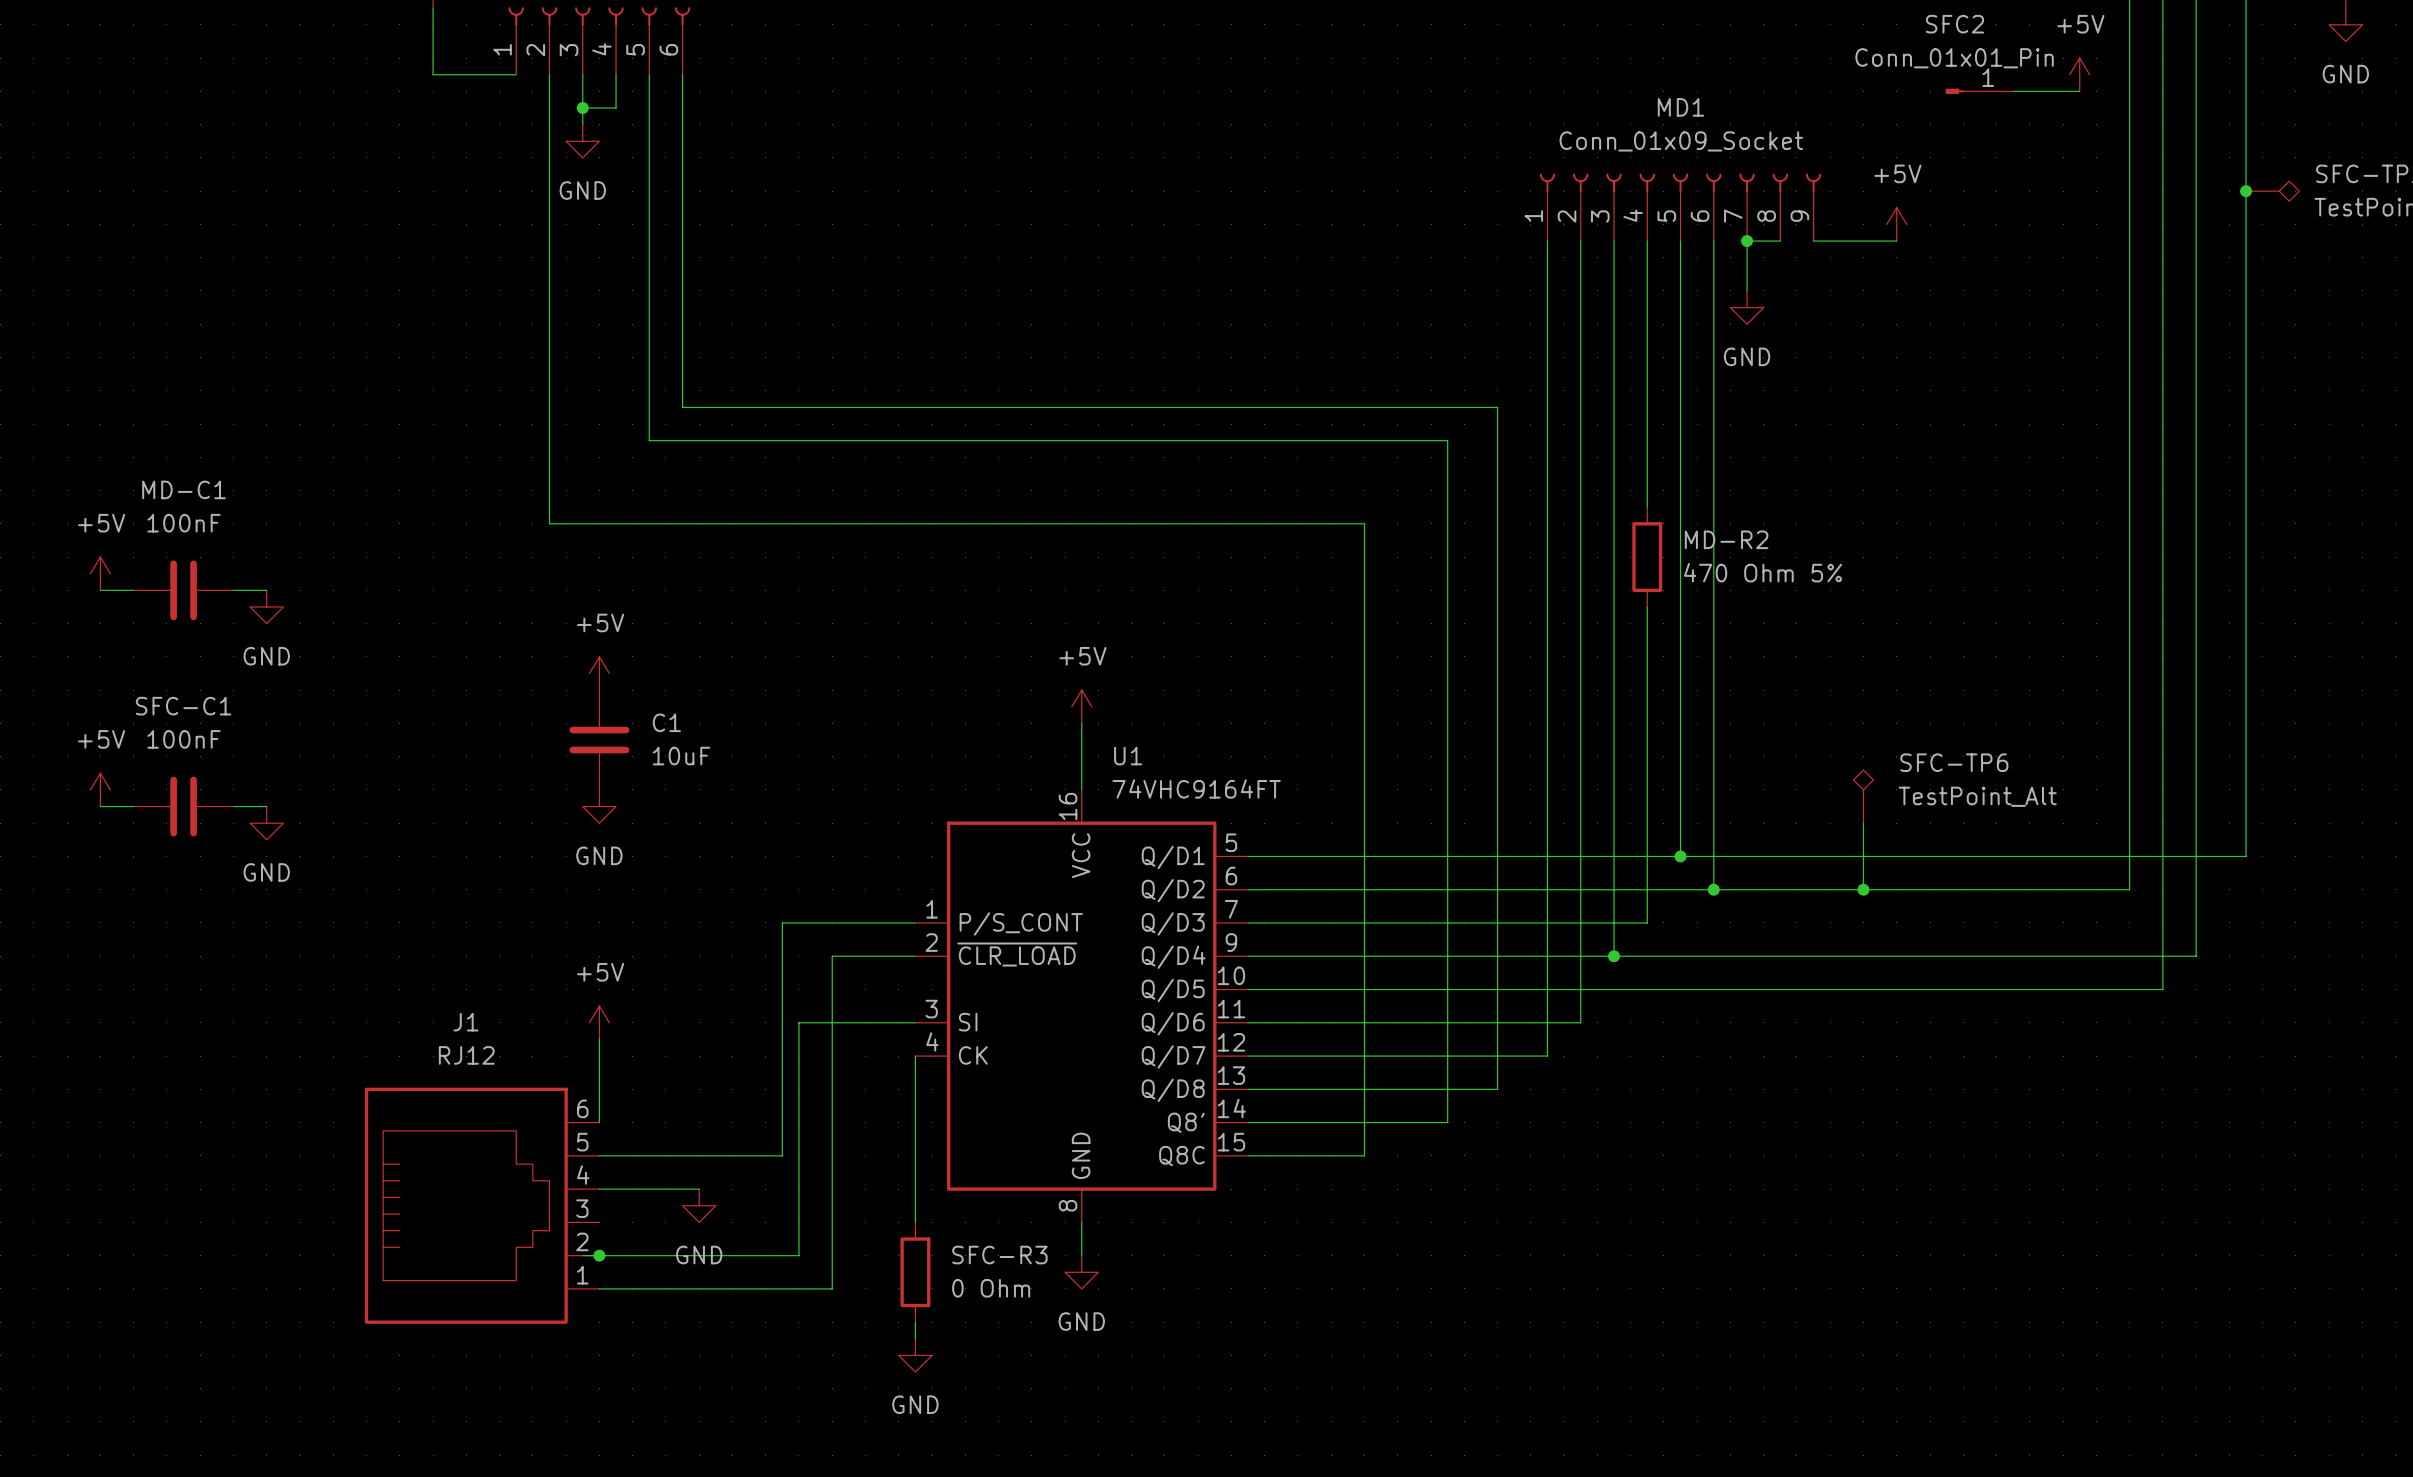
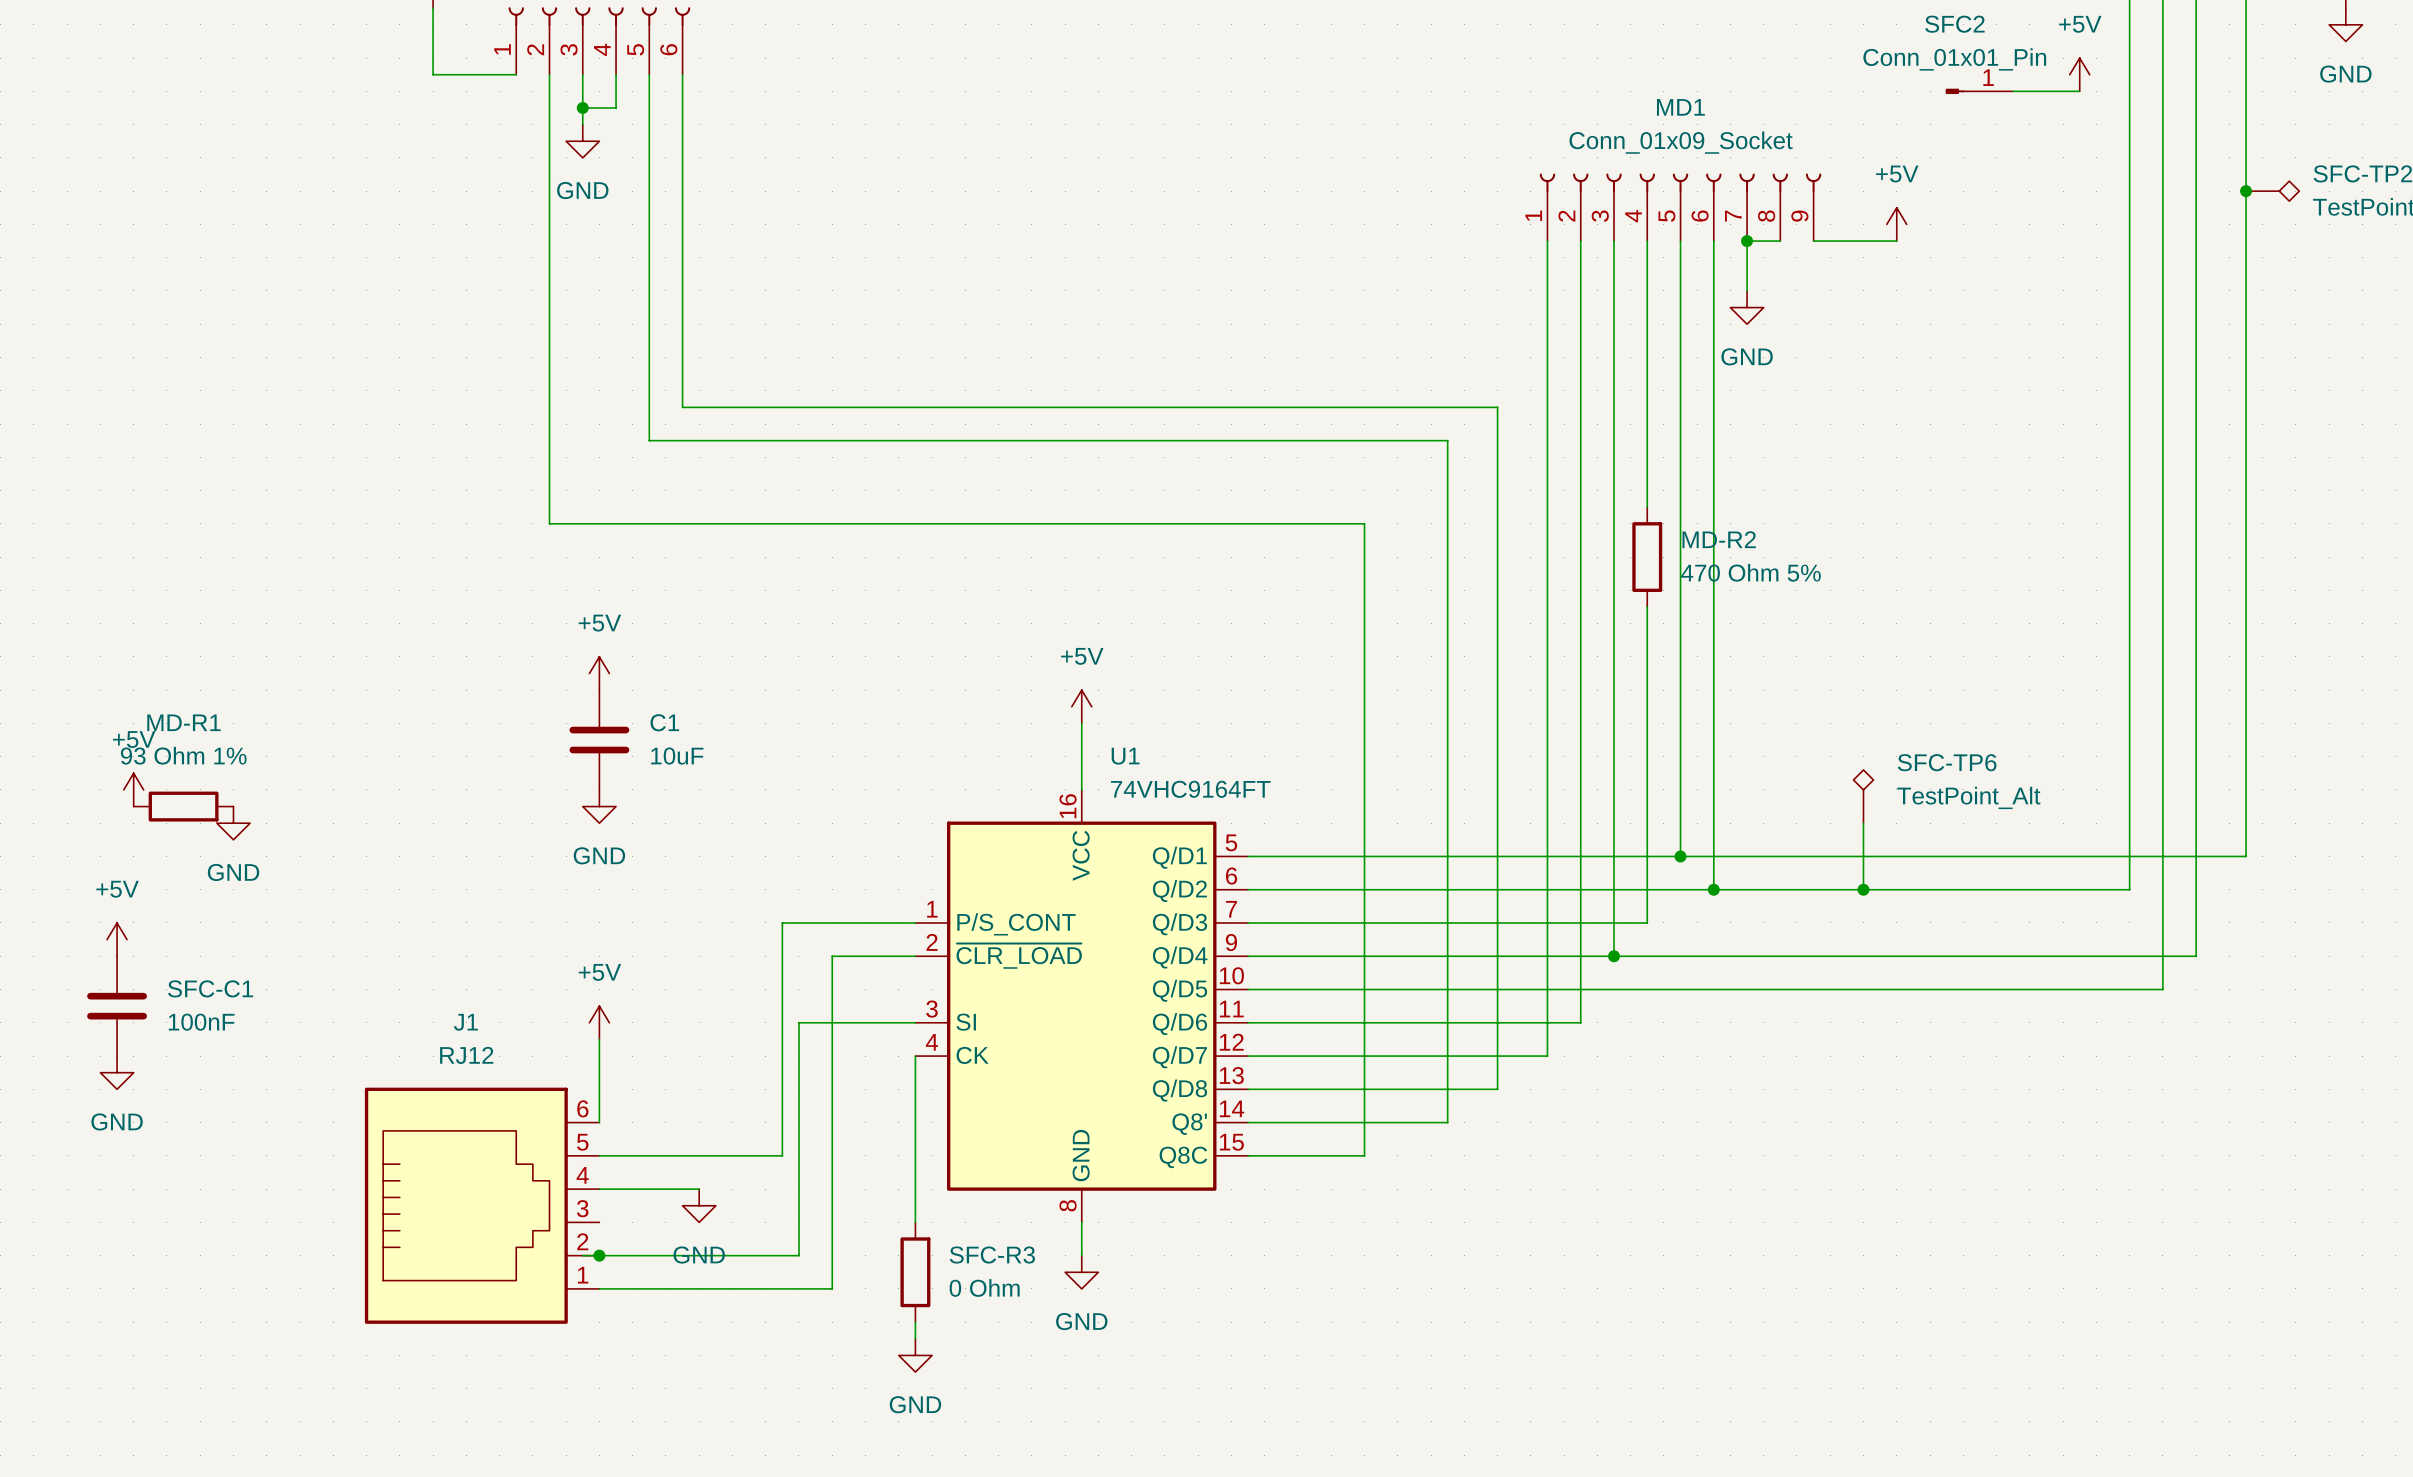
power symbol: +5V (100, 573) -> none
wire: (100, 590) (133, 590) -> none
MD-C1: 100nF (183, 590) -> none
wire: (233, 590) (266, 590) -> none
power symbol: GND (266, 606) -> none
SFC-C1 value position: 100nF (183, 739) -> 100nF (201, 1022)
power symbol position: +5V (100, 789) -> +5V (133, 789)
wire: (100, 806) (133, 806) -> none
SFC-C1 rotation: 0° (183, 806) -> 90° clockwise (117, 1006)
SFC-C1 position: (183, 806) -> (117, 1006)
MD-R1: none -> 93 Ohm 1% (183, 806)
wire: (233, 806) (266, 806) -> none
power symbol position: GND (266, 823) -> GND (233, 823)
power symbol: none -> +5V (117, 939)
power symbol: none -> GND (117, 1072)

